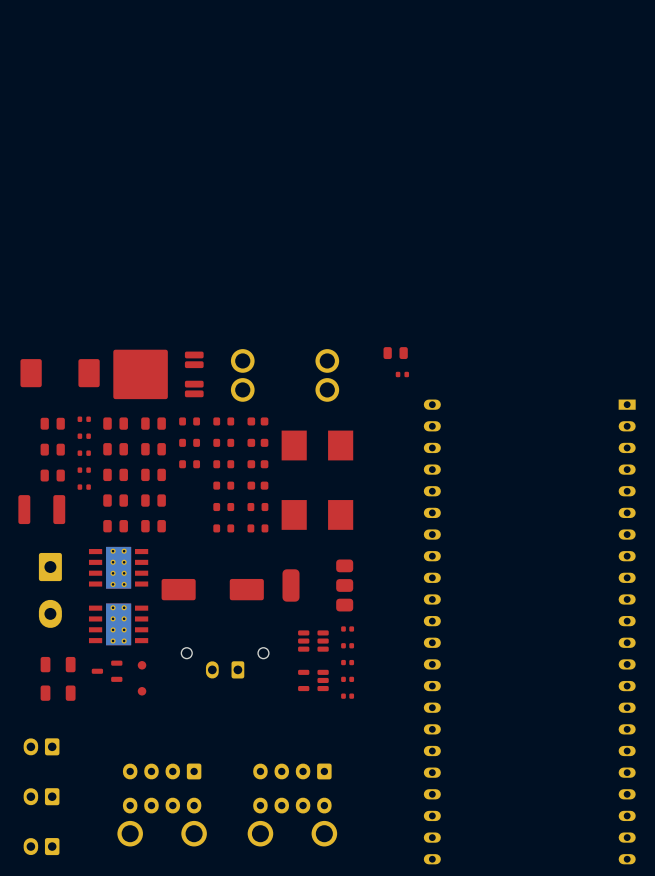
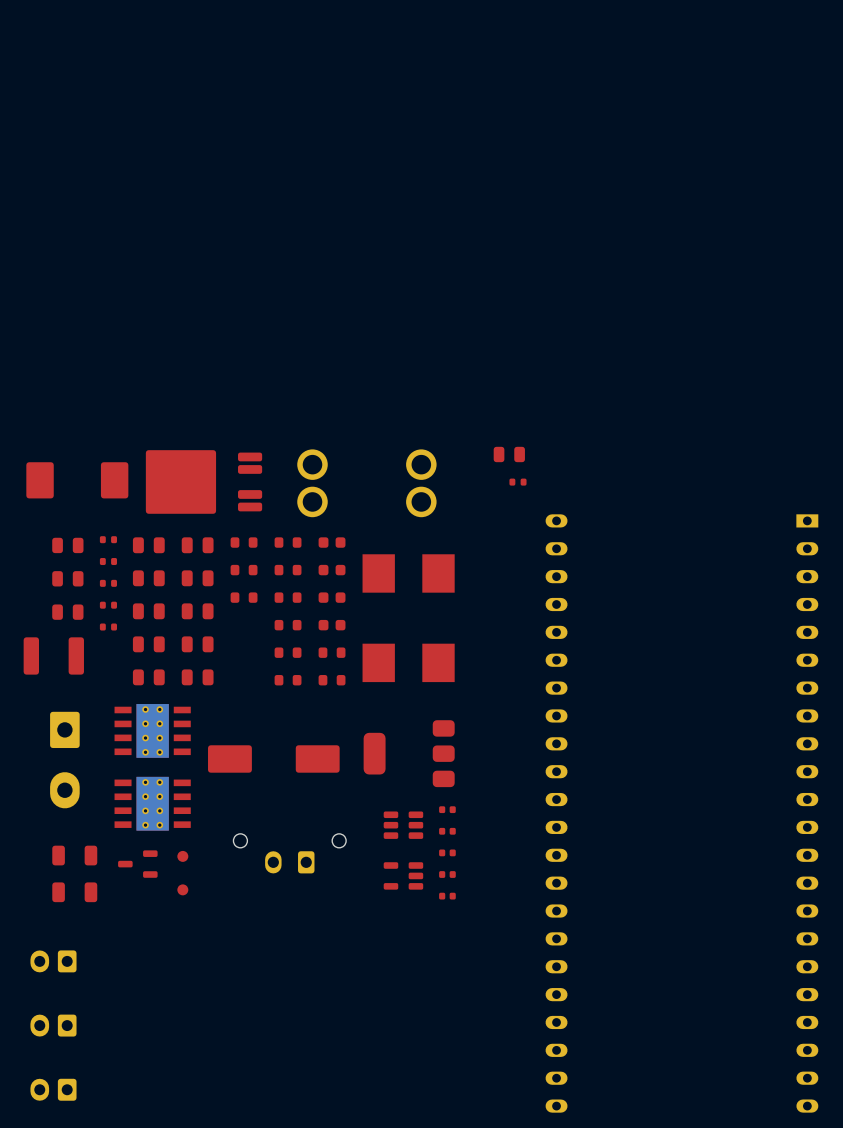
part: (162, 805) -> none
part: (292, 805) -> none

